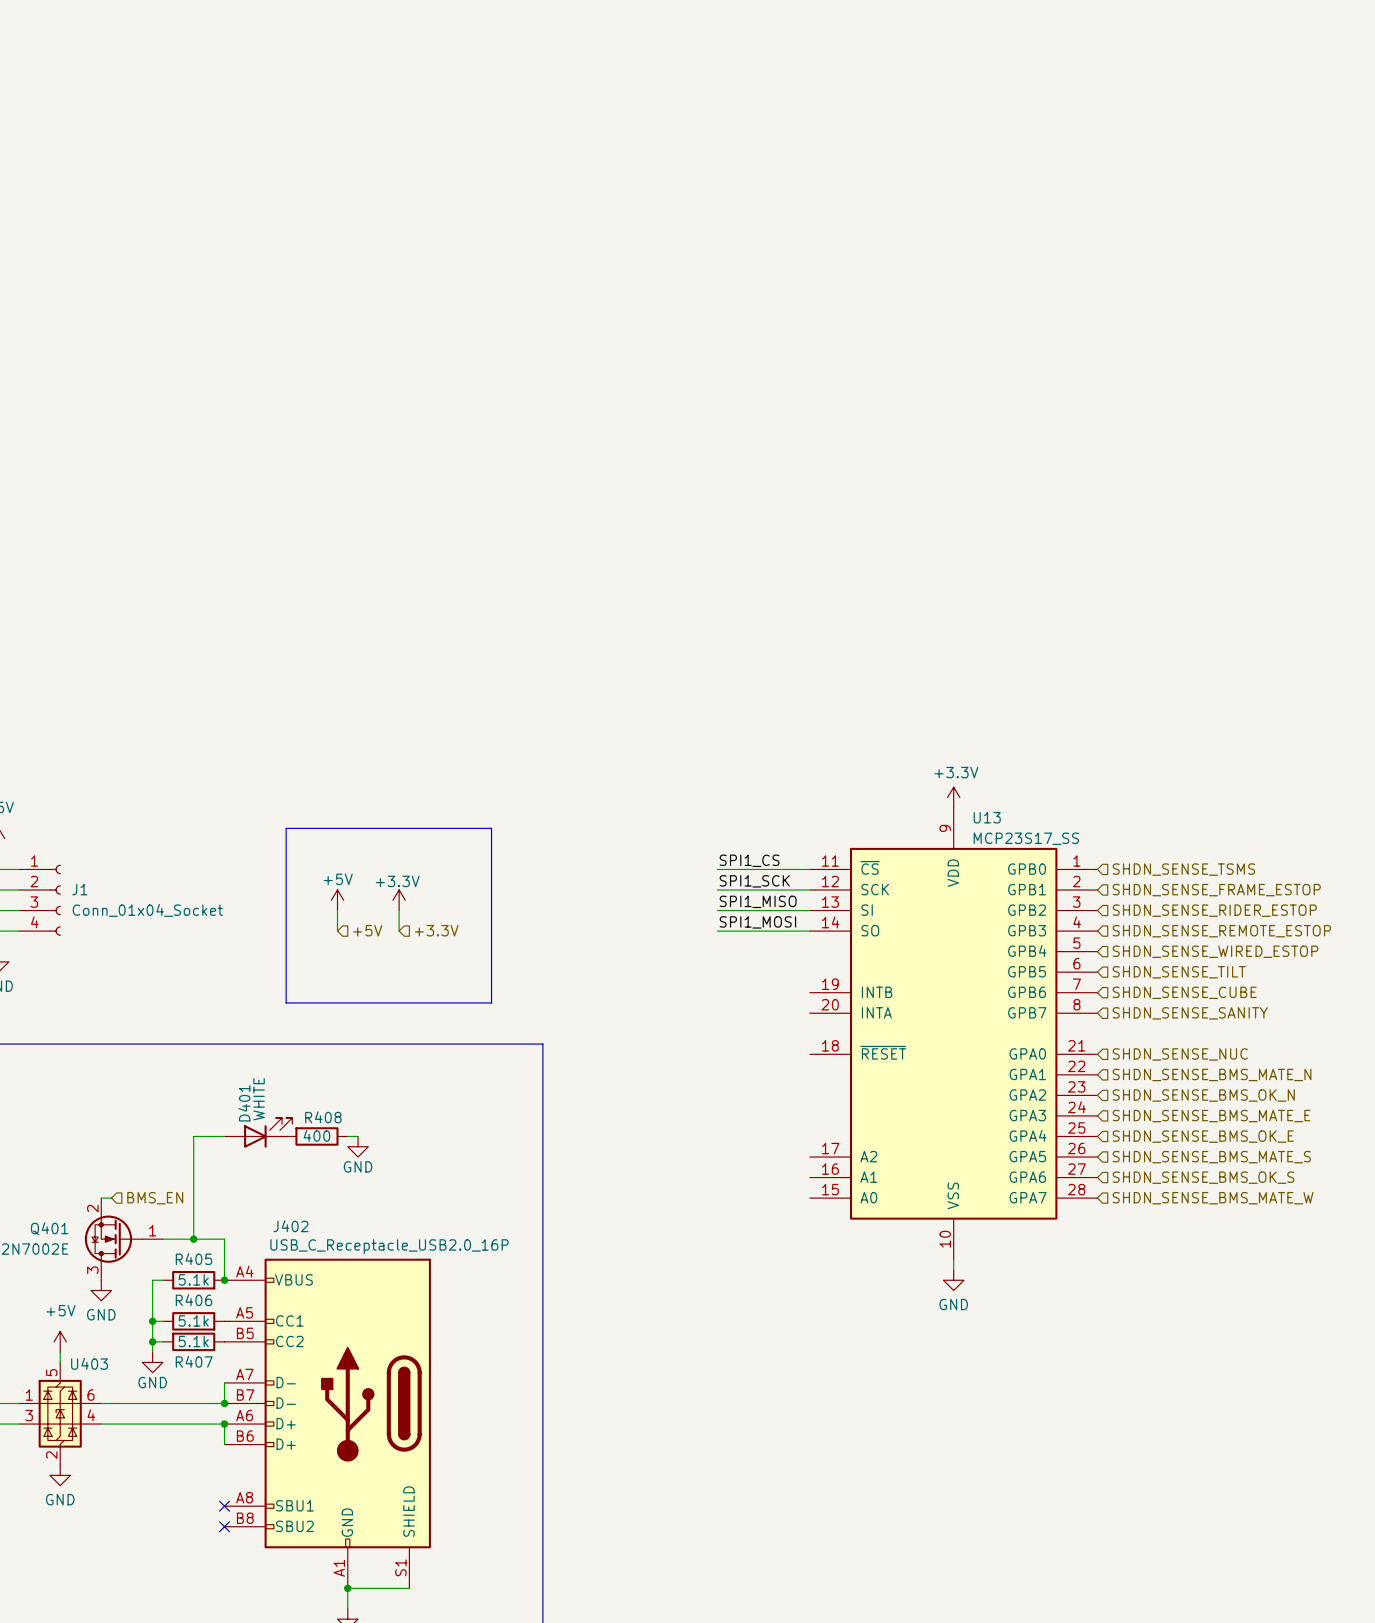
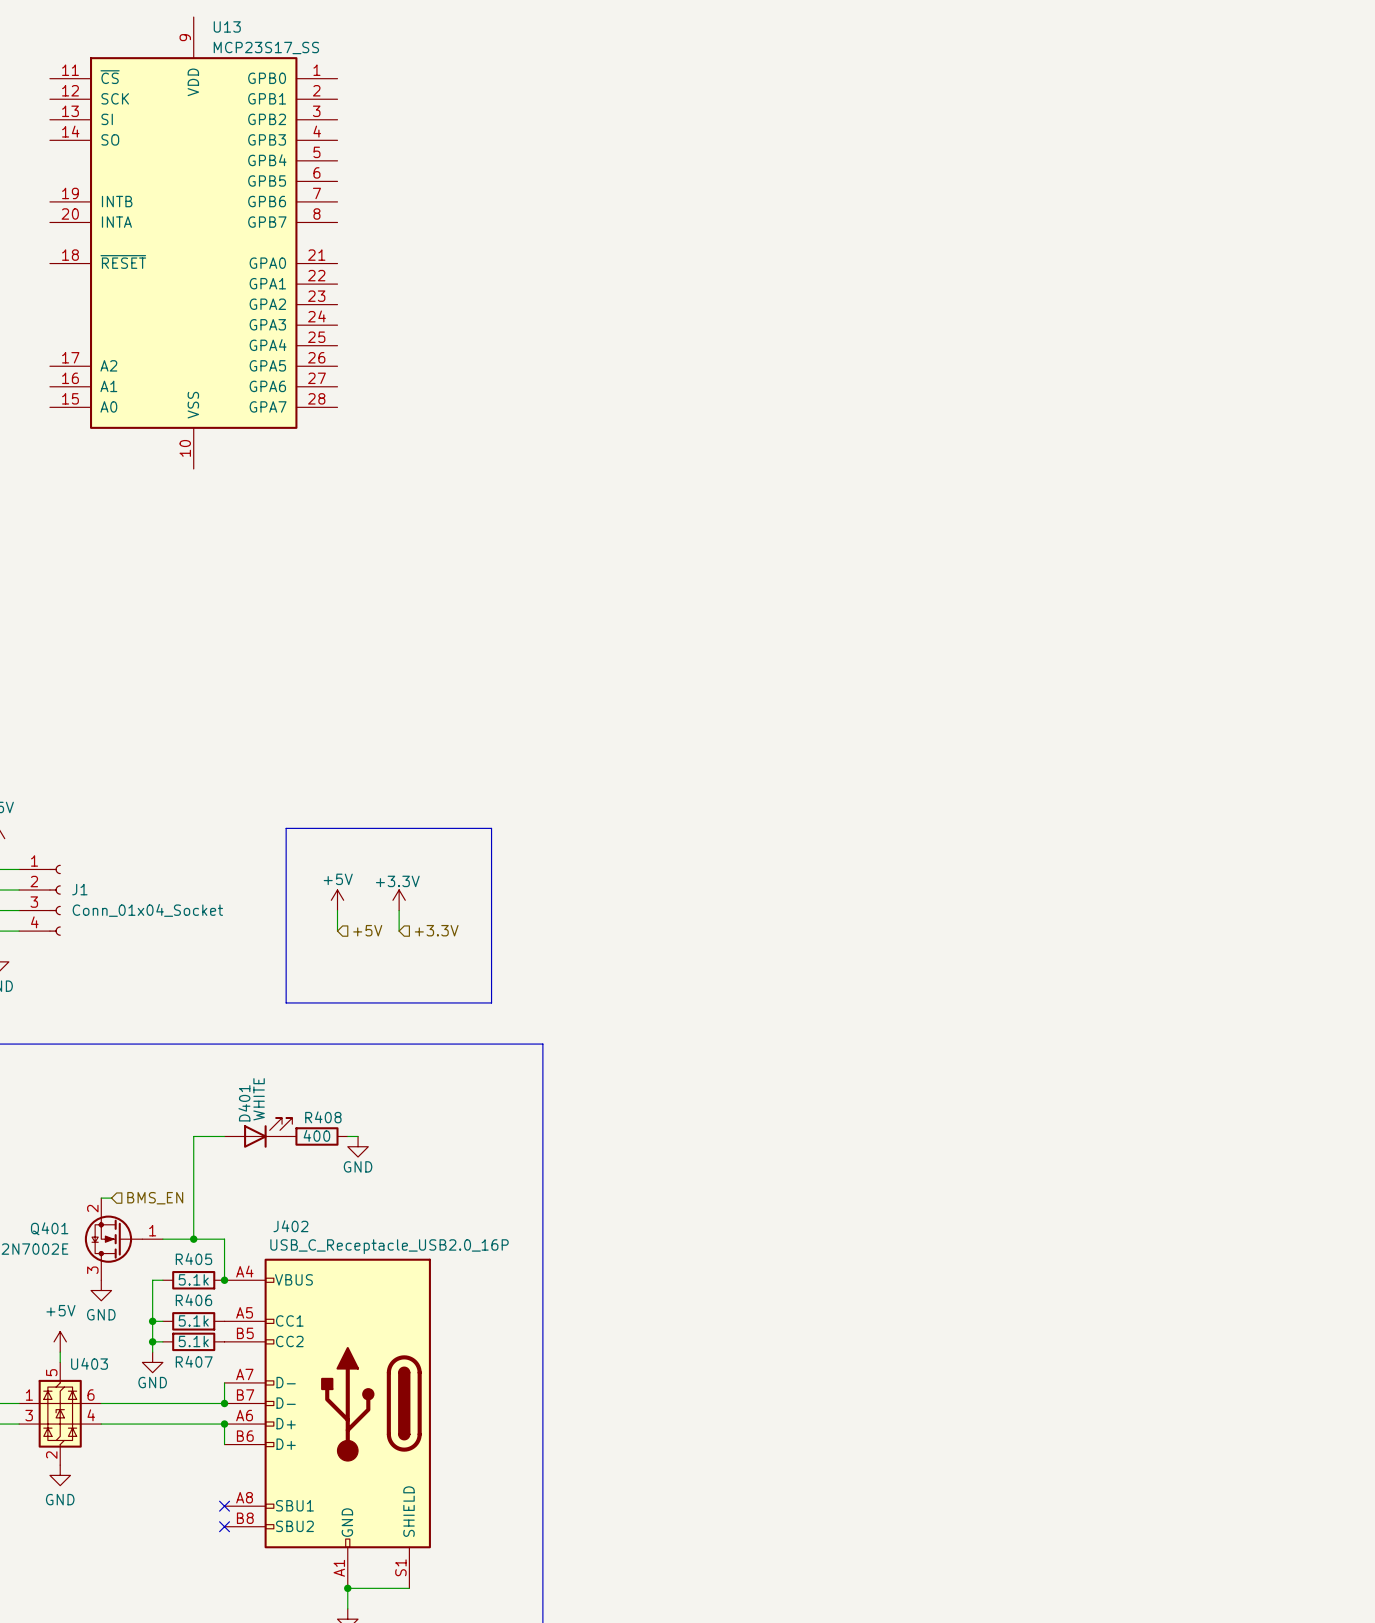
power symbol: +3.3V (953, 797) -> none
label: SPI1_CS (749, 860) -> none
wire: (717, 869) (809, 869) -> none
hierarchical label: SHDN_SENSE_TSMS (1183, 869) -> none
label: SPI1_SCK (754, 881) -> none
wire: (717, 890) (809, 890) -> none
hierarchical label: SHDN_SENSE_FRAME_ESTOP (1216, 890) -> none
label: SPI1_MISO (758, 901) -> none
wire: (717, 910) (809, 910) -> none
hierarchical label: SHDN_SENSE_RIDER_ESTOP (1214, 910) -> none
label: SPI1_MOSI (757, 922) -> none
wire: (717, 931) (809, 931) -> none
hierarchical label: SHDN_SENSE_REMOTE_ESTOP (1221, 931) -> none
hierarchical label: SHDN_SENSE_WIRED_ESTOP (1215, 951) -> none
hierarchical label: SHDN_SENSE_TILT (1179, 972) -> none
hierarchical label: SHDN_SENSE_CUBE (1184, 992) -> none
hierarchical label: SHDN_SENSE_SANITY (1190, 1013) -> none
U13 position: (953, 1033) -> (193, 243)
hierarchical label: SHDN_SENSE_NUC (1180, 1054) -> none
hierarchical label: SHDN_SENSE_BMS_MATE_N (1212, 1074) -> none
hierarchical label: SHDN_SENSE_BMS_OK_N (1203, 1095) -> none
hierarchical label: SHDN_SENSE_BMS_MATE_E (1211, 1116) -> none
hierarchical label: SHDN_SENSE_BMS_OK_E (1203, 1136) -> none
hierarchical label: SHDN_SENSE_BMS_MATE_S (1211, 1157) -> none
hierarchical label: SHDN_SENSE_BMS_OK_S (1203, 1177) -> none
hierarchical label: SHDN_SENSE_BMS_MATE_W (1213, 1198) -> none
wire: (953, 1259) (953, 1269) -> none
power symbol: GND (953, 1280) -> none

